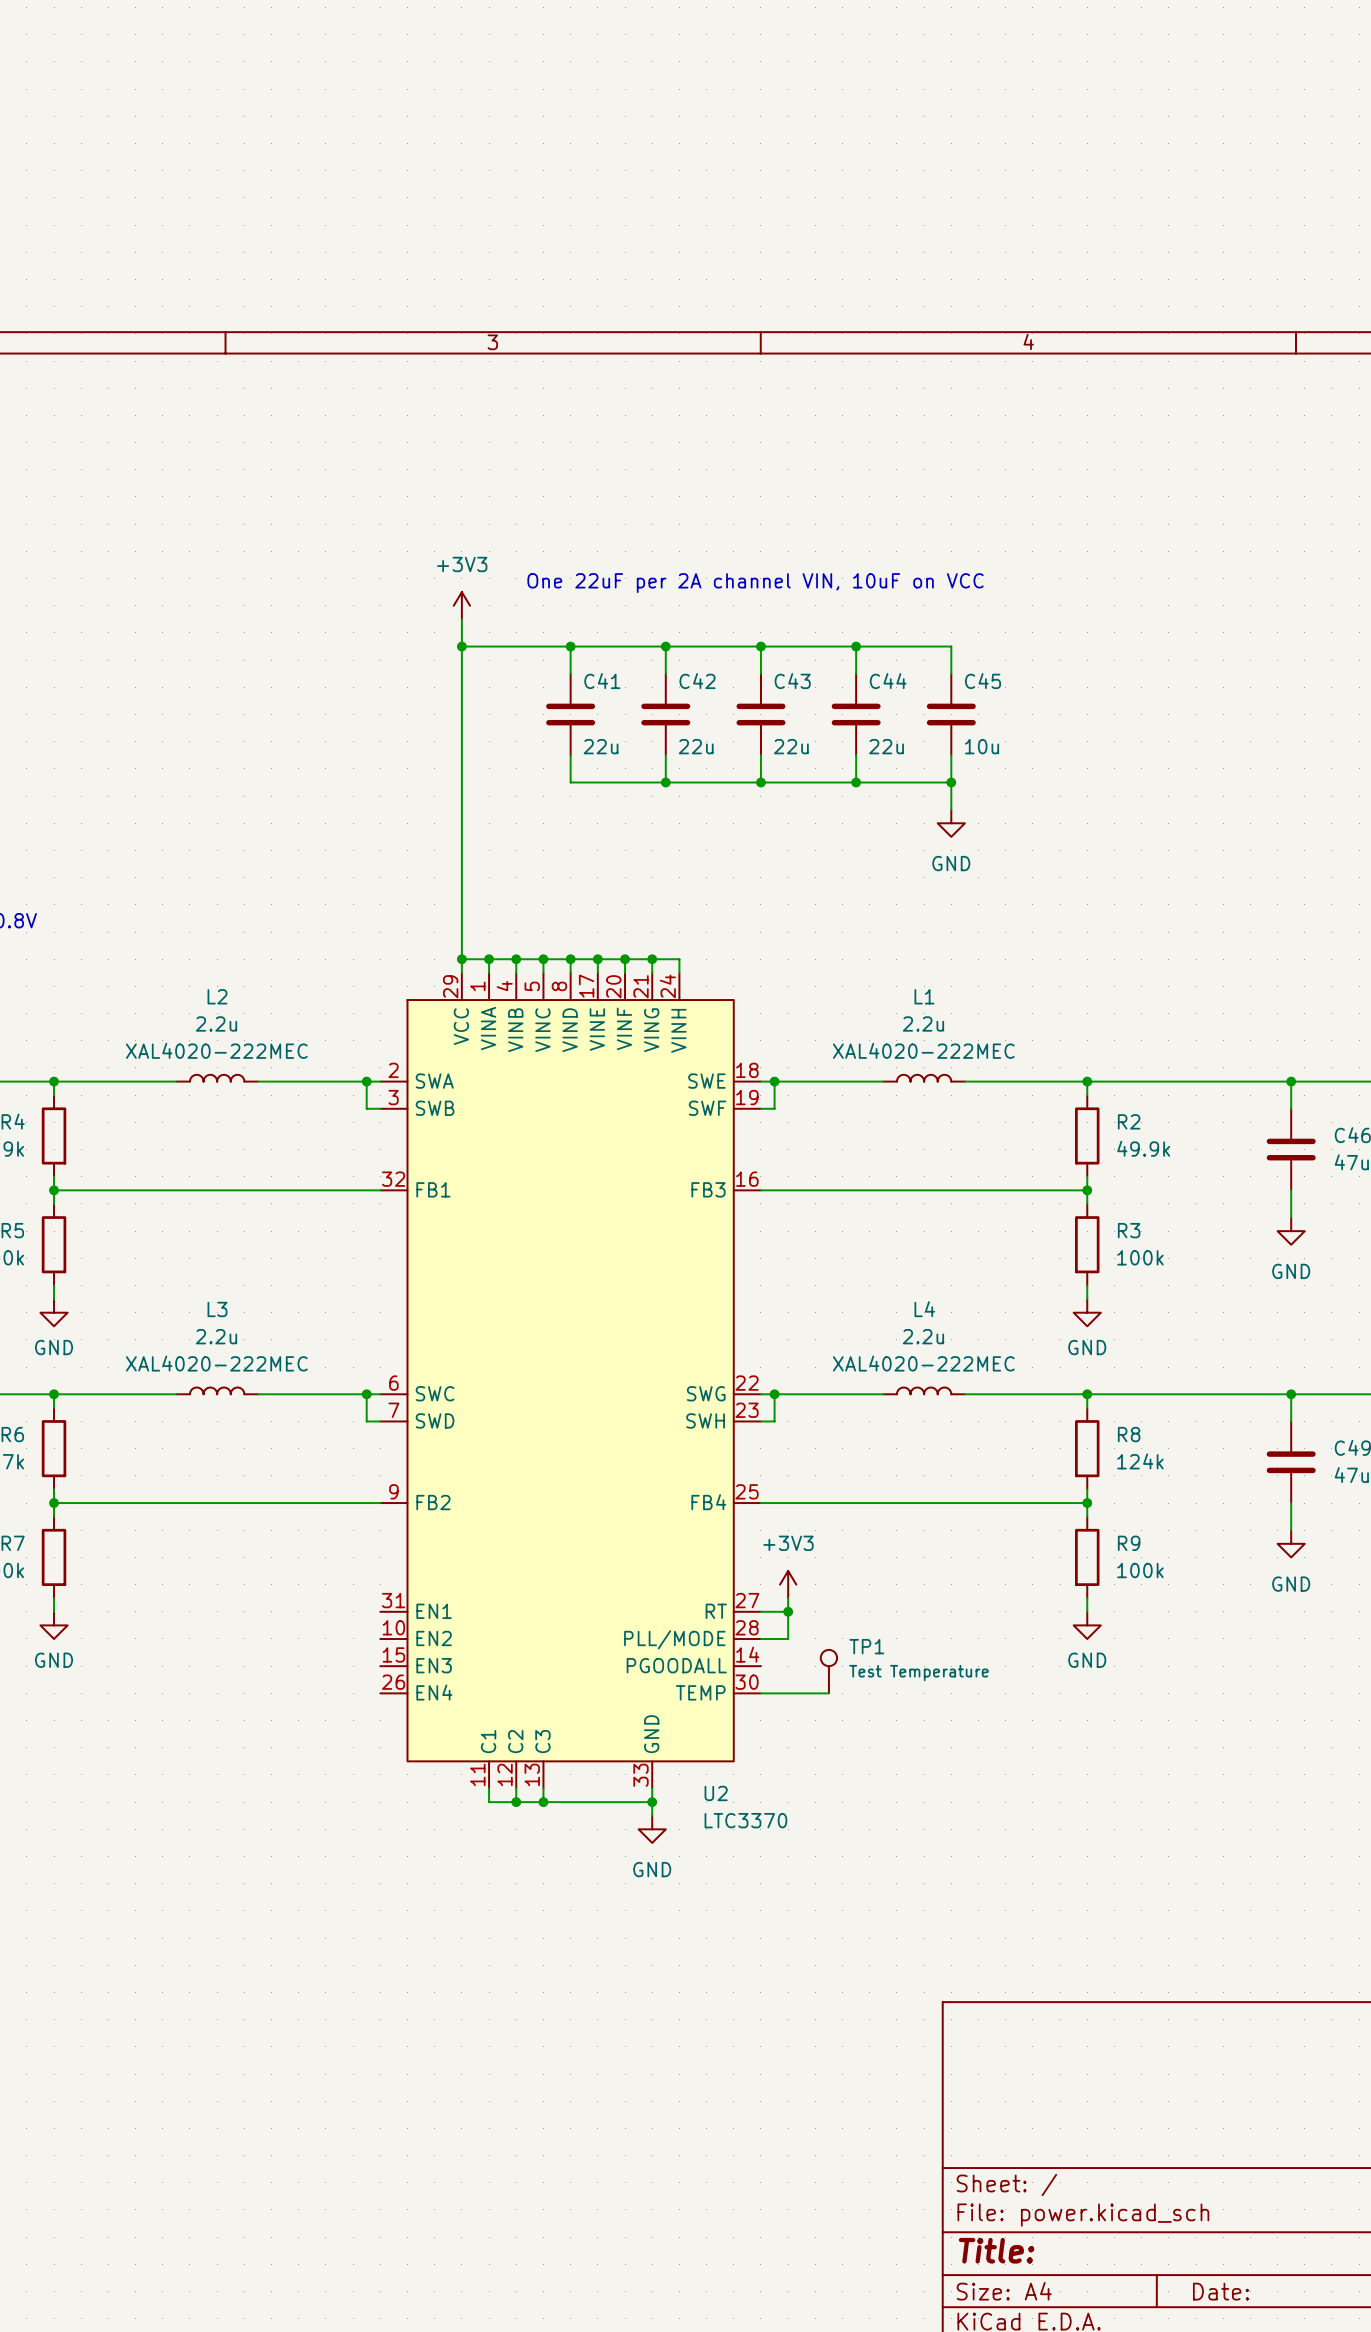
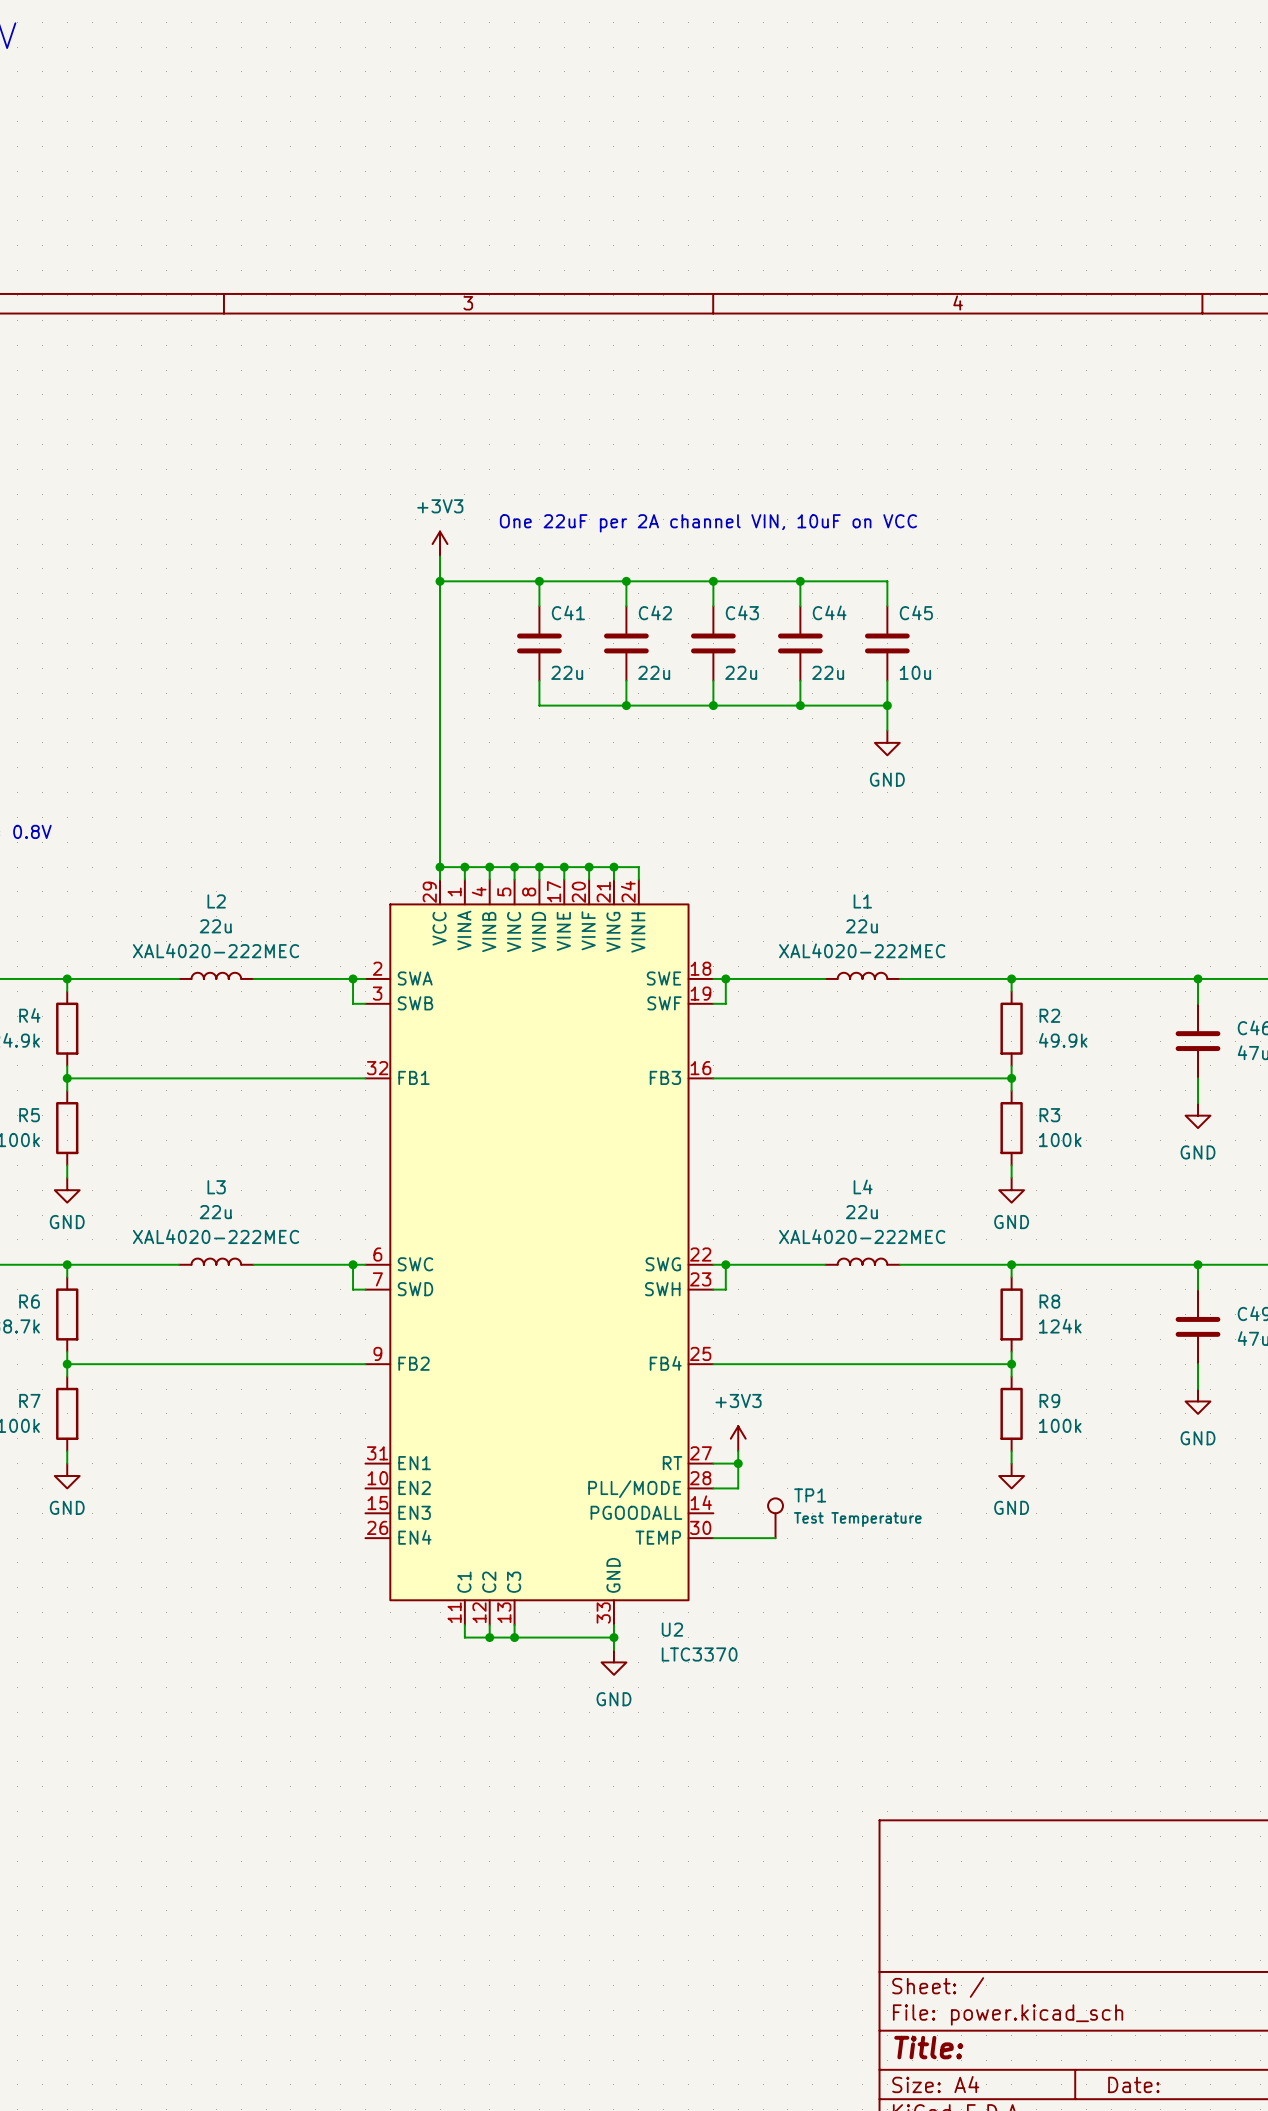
L2 value: 2.2u (216, 1023) -> 22u (215, 926)
L1 value: 2.2u (923, 1023) -> 22u (861, 926)
L3 value: 2.2u (216, 1336) -> 22u (215, 1212)
L4 value: 2.2u (923, 1336) -> 22u (861, 1212)

